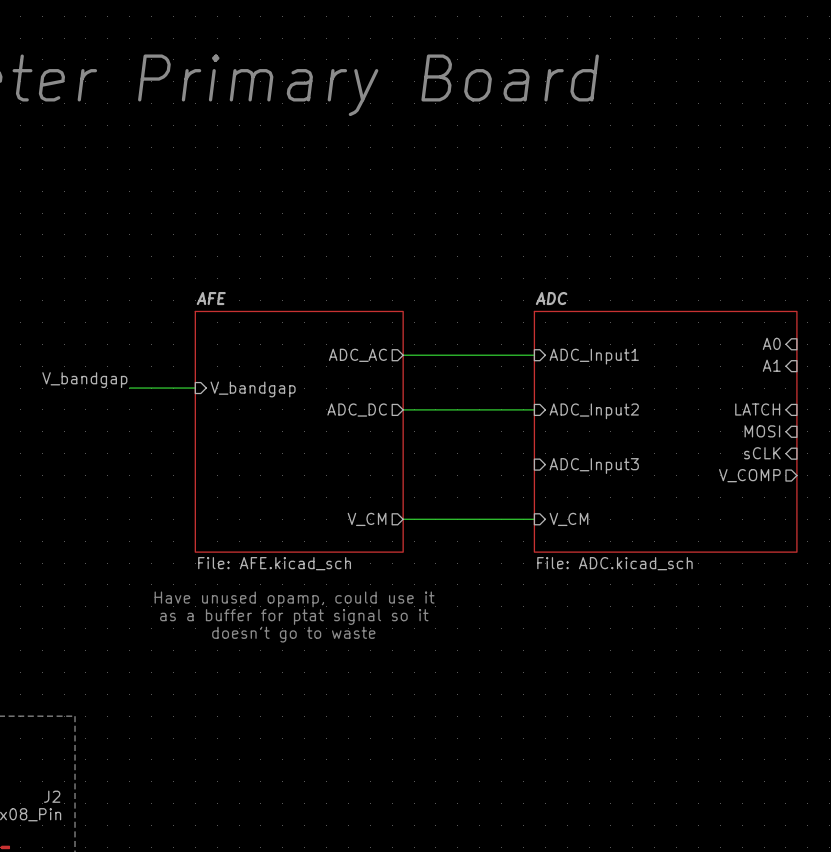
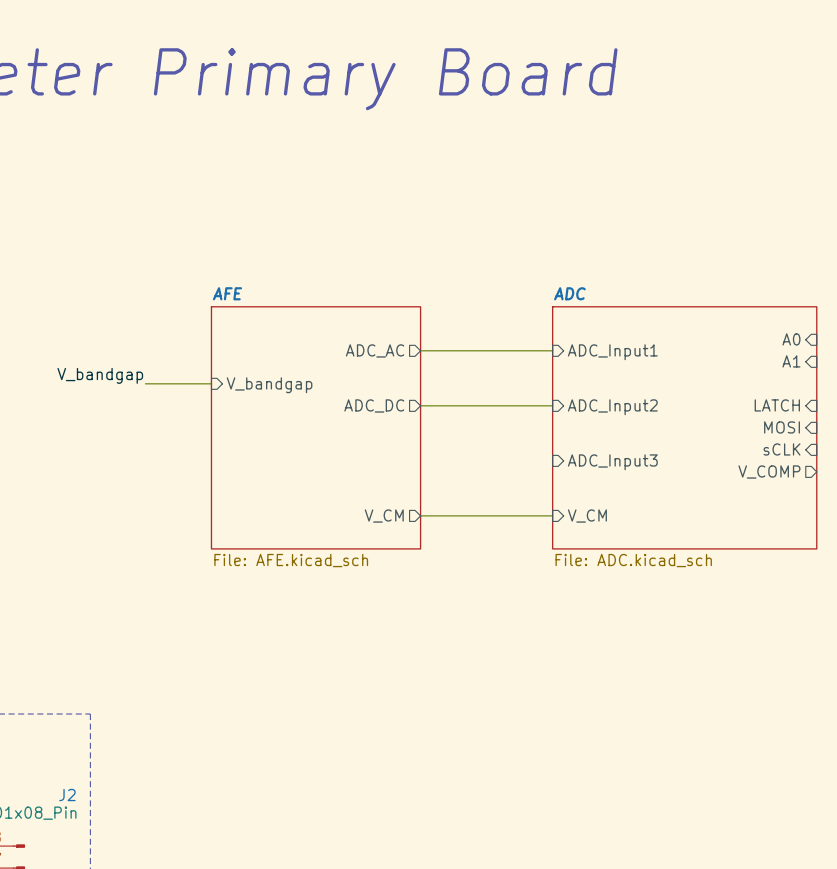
text: Have unused opamp, could use it (294, 599) -> none
text: as a buffer for ptat signal so it (294, 616) -> none
text: doesn't go to waste (293, 634) -> none

